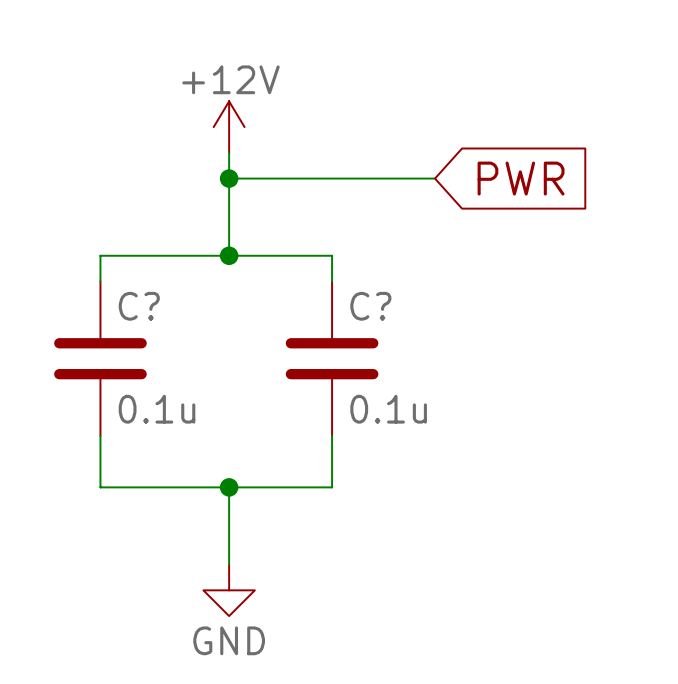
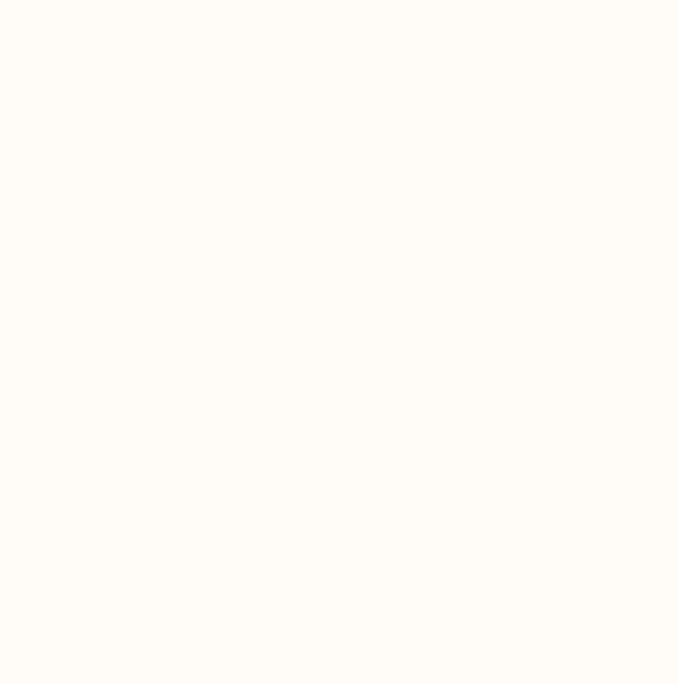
power symbol: +12V (229, 127) -> none
wire: (229, 152) (229, 255) -> none
wire: (229, 178) (435, 178) -> none
junction: (229, 178) -> none
global label: PWR (521, 178) -> none
junction: (229, 255) -> none
wire: (100, 281) (100, 255) (332, 255) (332, 281) -> none
C?: 0.1u (100, 358) -> none
C?: 0.1u (332, 358) -> none
wire: (100, 435) (100, 487) (332, 487) (332, 435) -> none
wire: (229, 487) (229, 564) -> none
junction: (229, 487) -> none
power symbol: GND (229, 590) -> none

